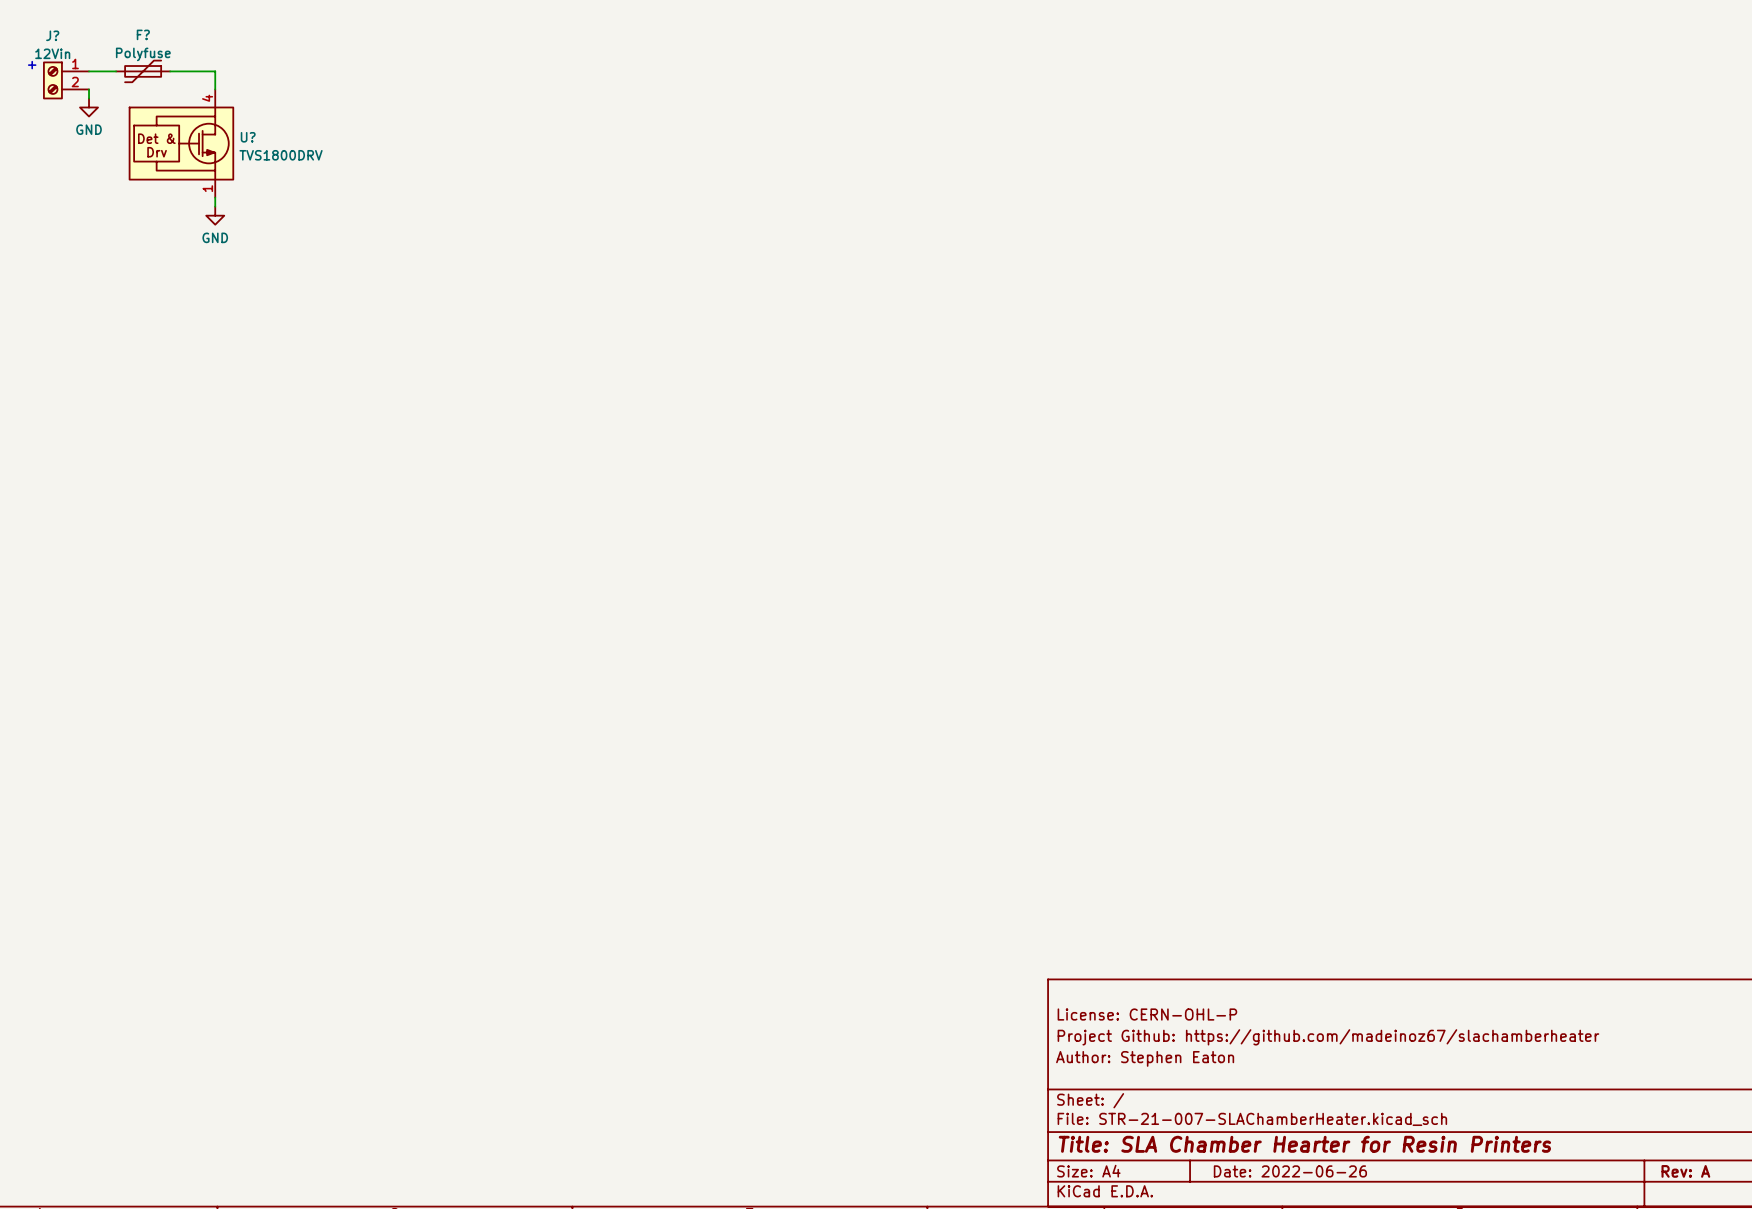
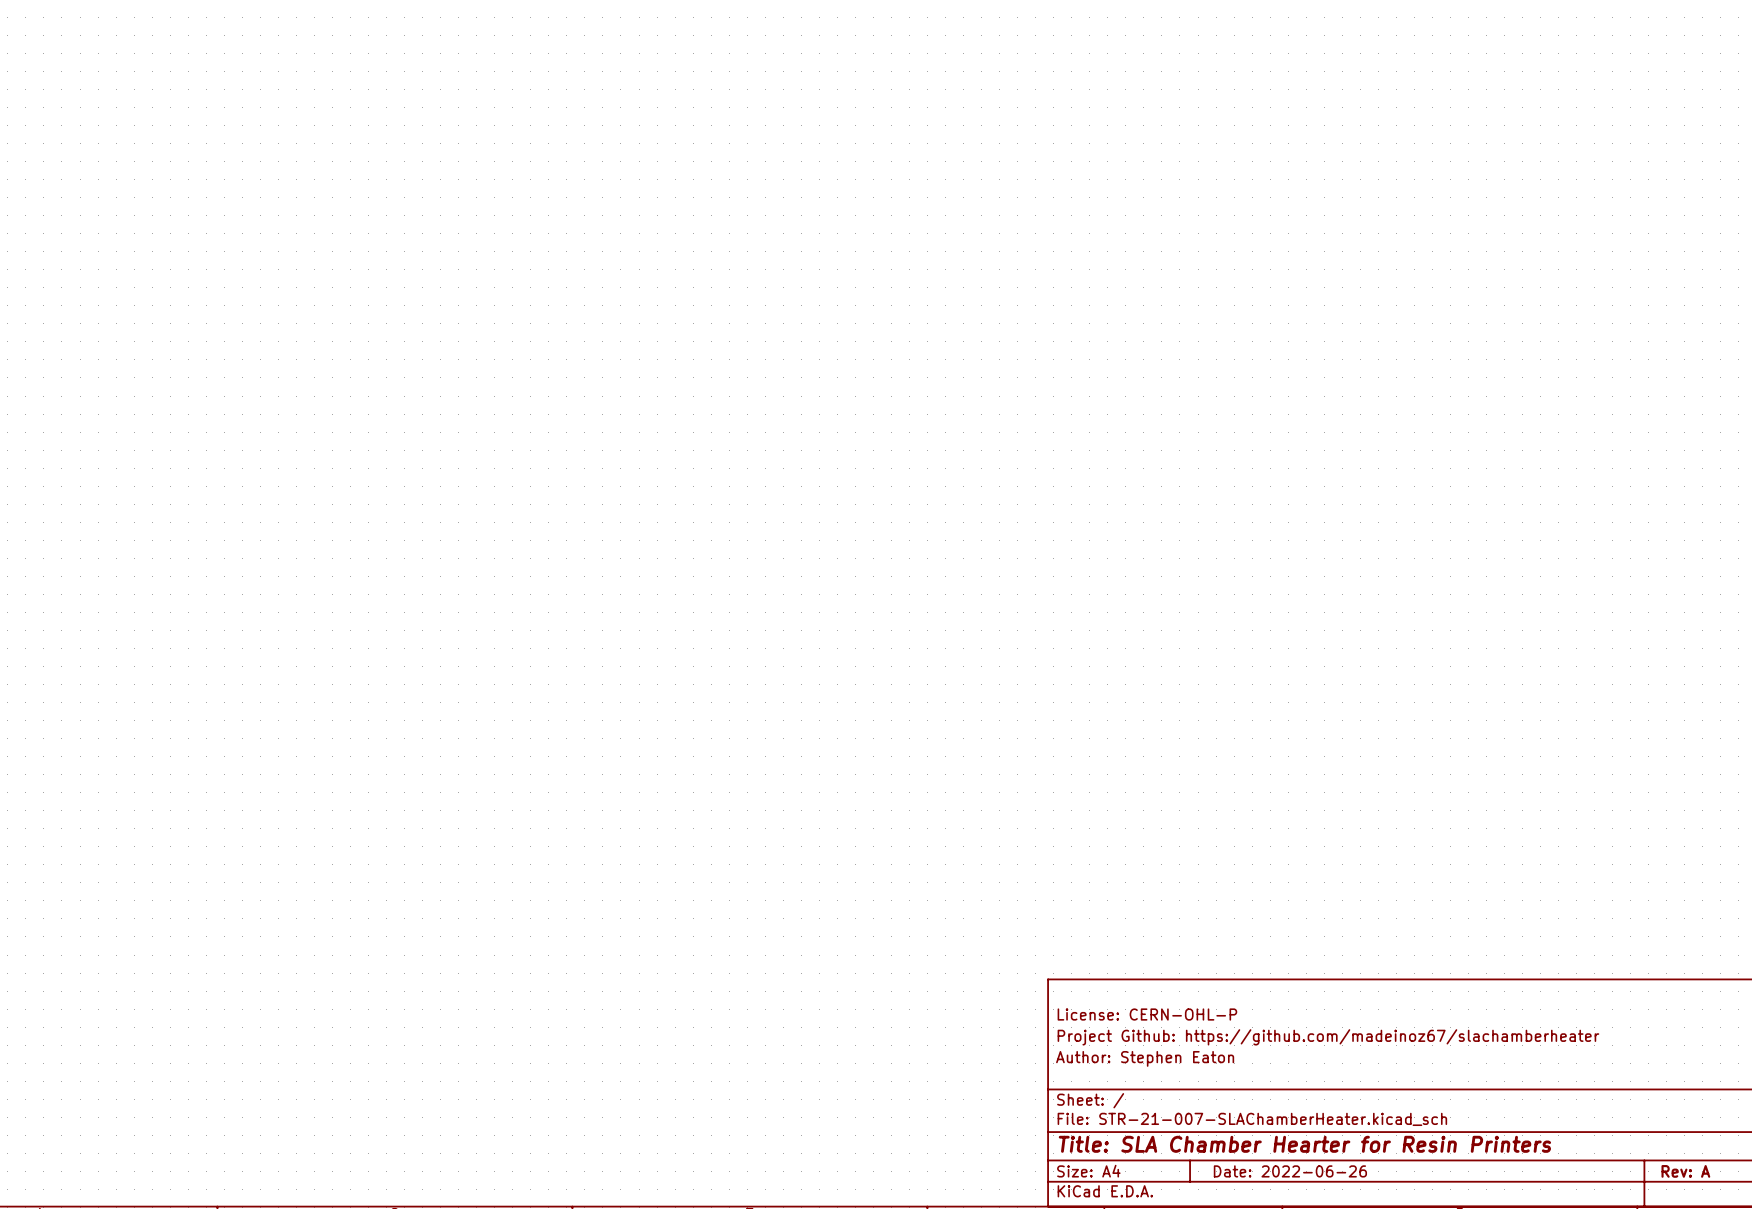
text: + (32, 65) -> none
wire: (89, 71) (116, 71) -> none
F?: Polyfuse (143, 71) -> none
wire: (170, 71) (215, 71) (215, 89) -> none
J?: 12Vin (66, 80) -> none
wire: (89, 89) (89, 98) -> none
power symbol: GND (89, 107) -> none
U?: TVS1800DRV (181, 143) -> none
wire: (215, 197) (215, 206) -> none
power symbol: GND (215, 215) -> none

